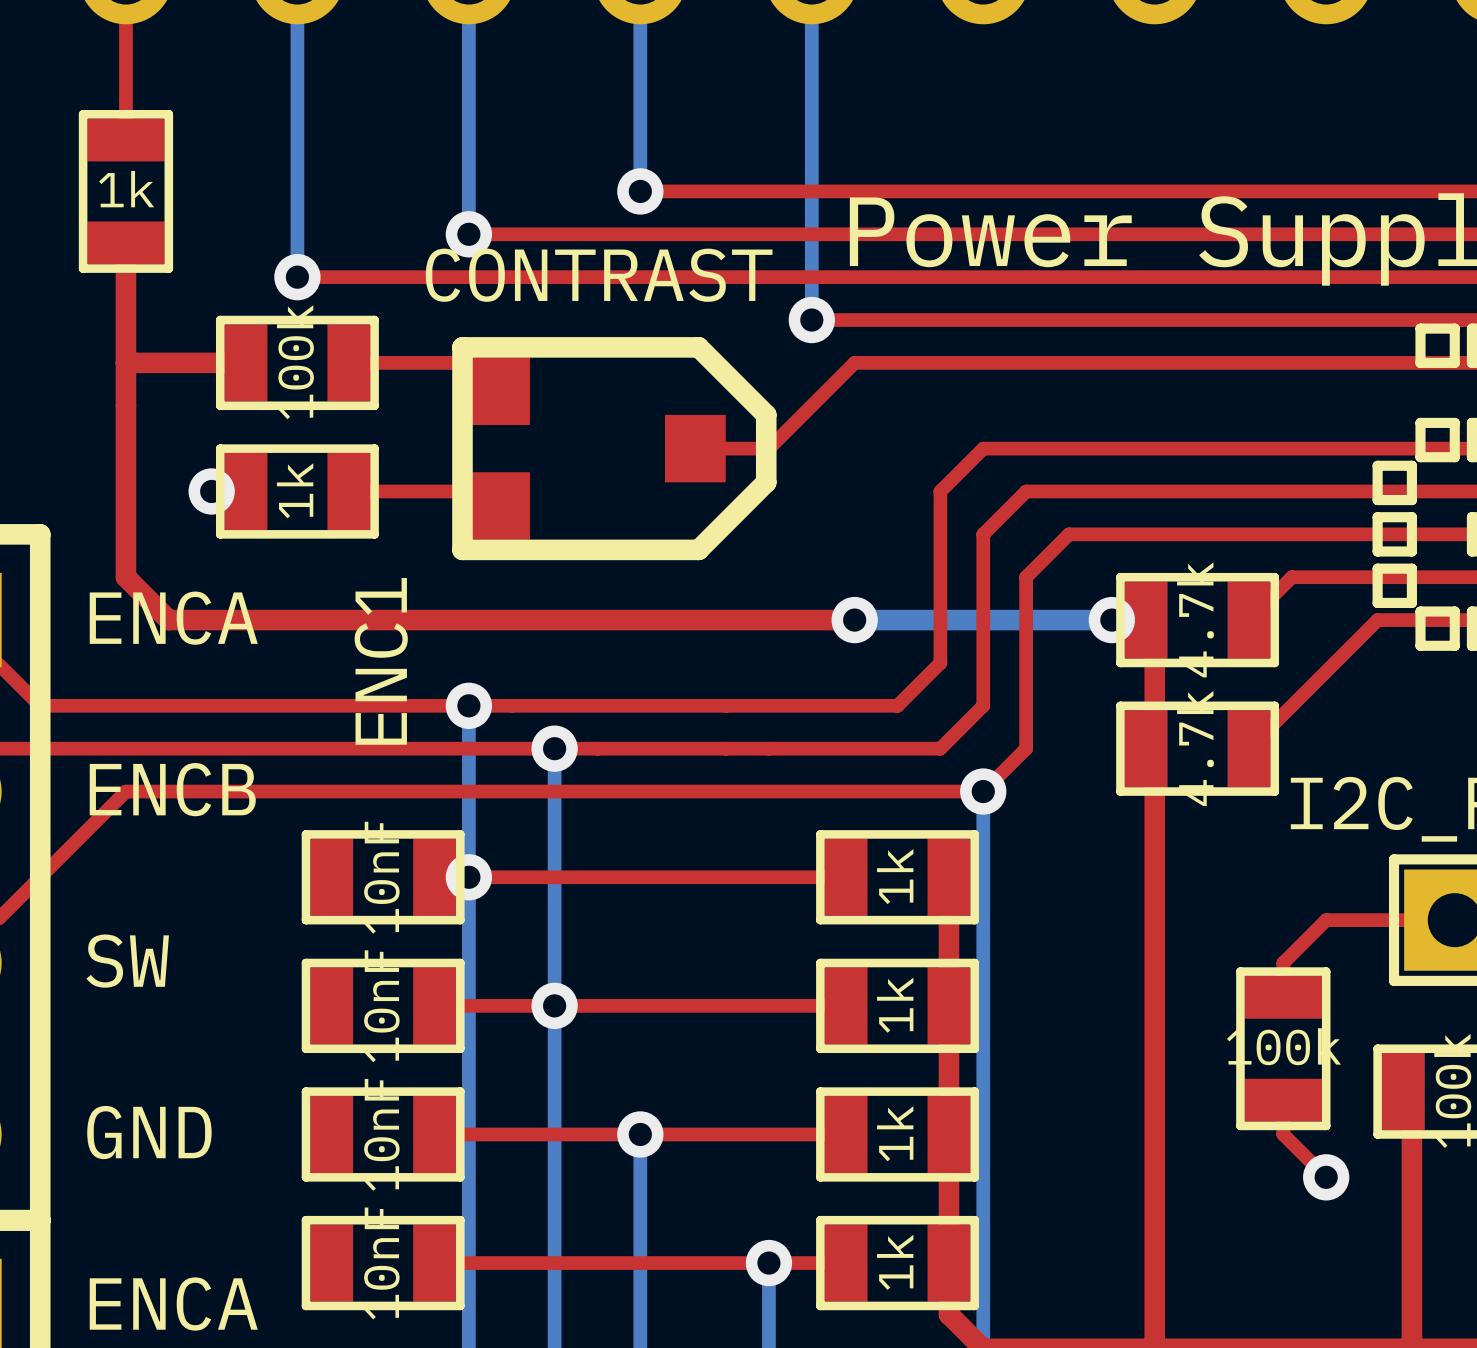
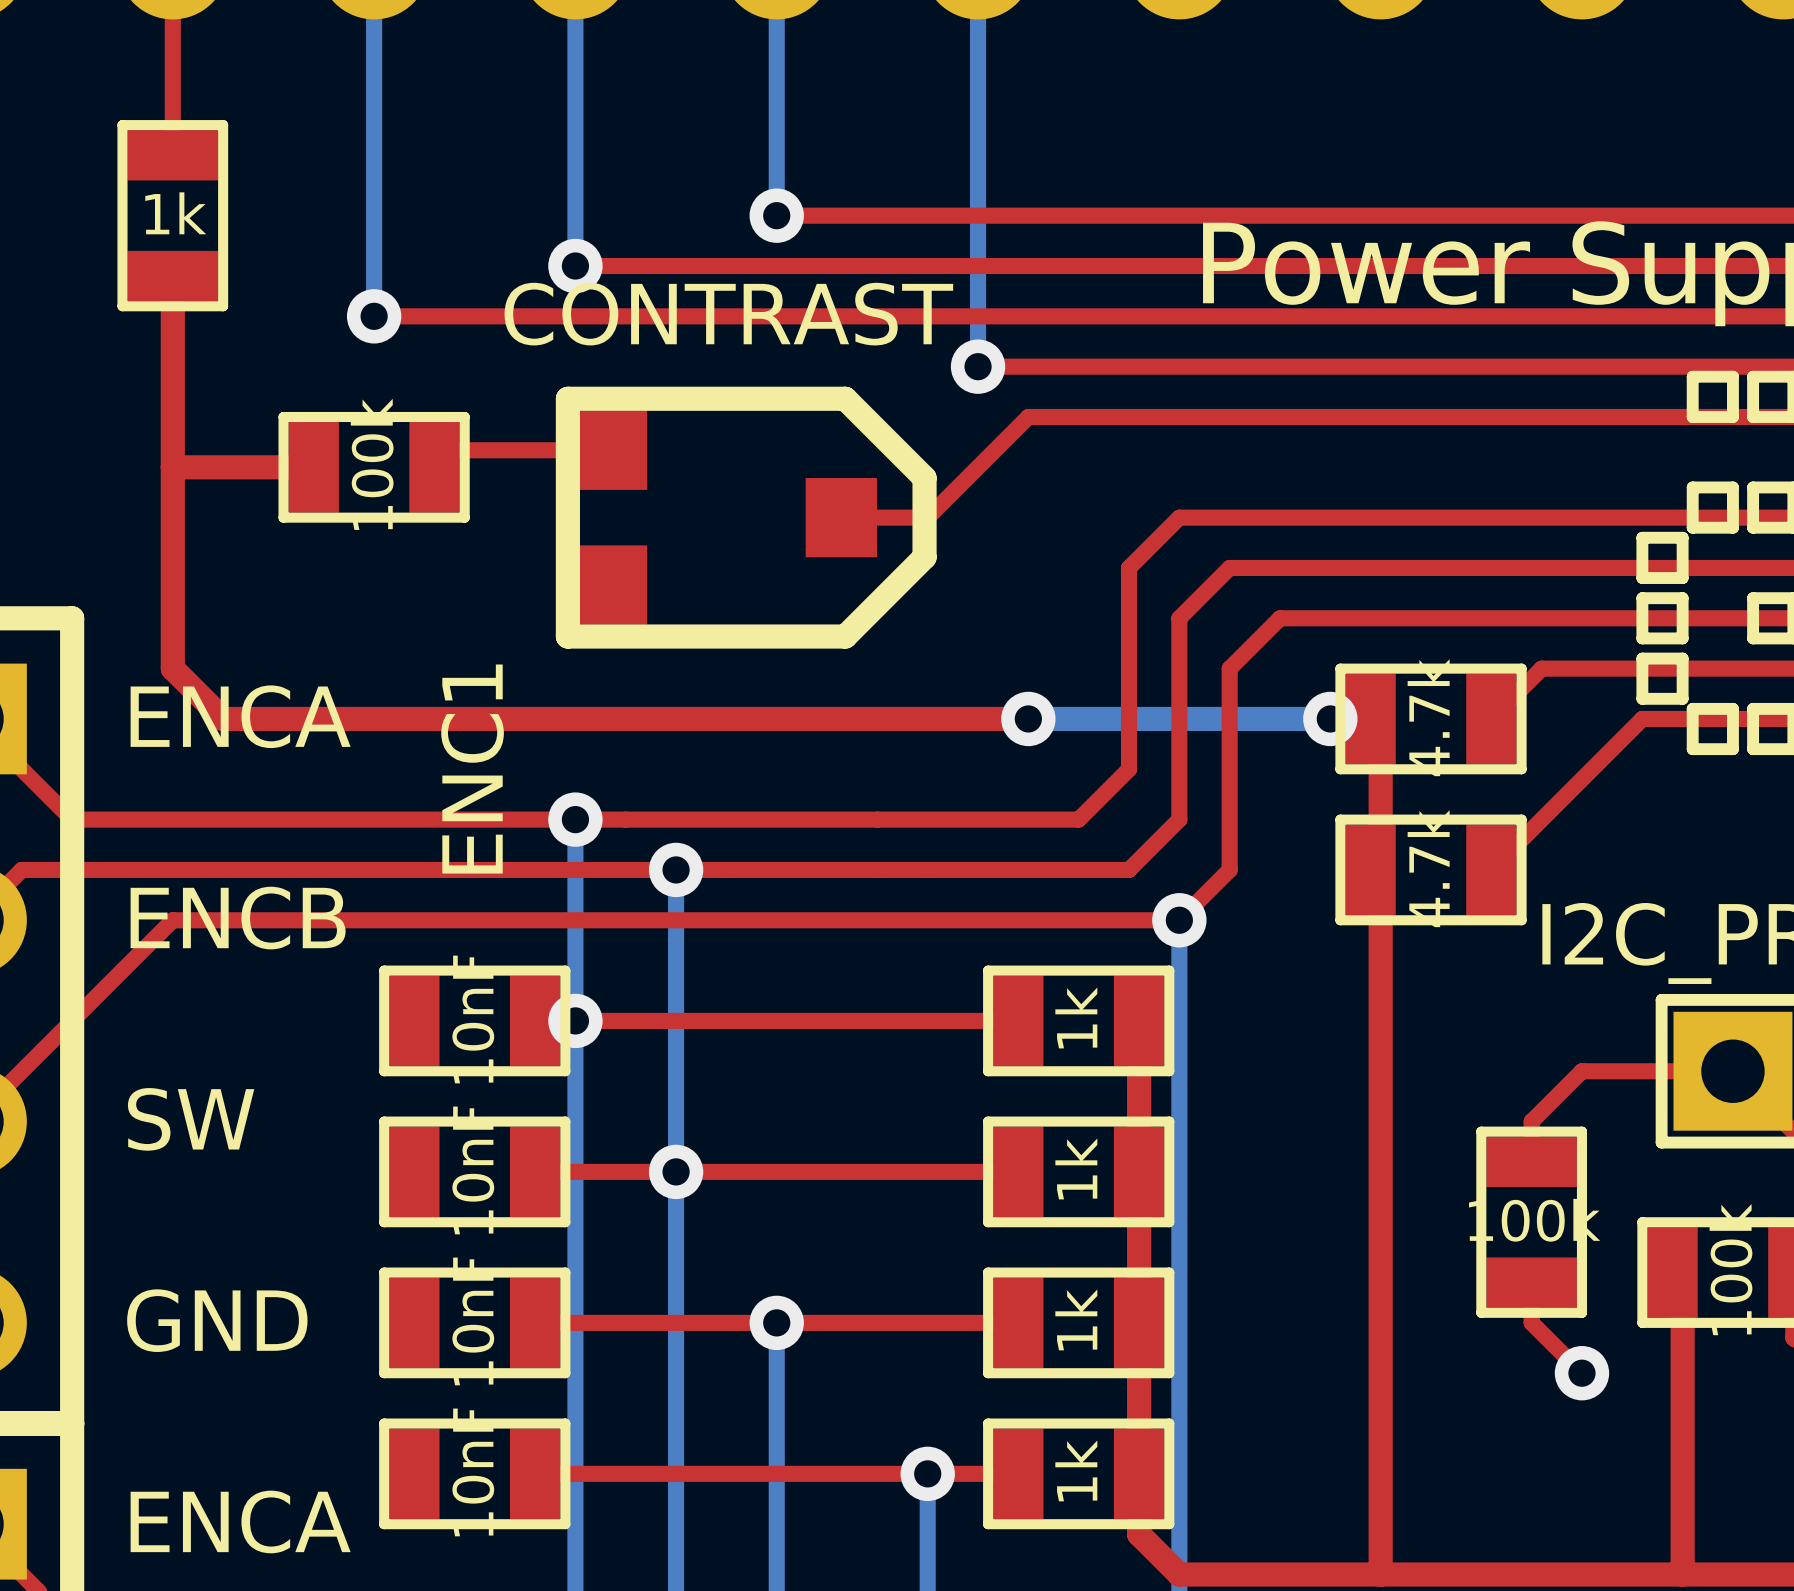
top track: (125, 362) (245, 362) -> (172, 467) (313, 467)
part position: (297, 362) -> (374, 467)
top track: (348, 362) (471, 362) (499, 391) -> (434, 467) (451, 450) (611, 450)
via: (211, 491) -> none
part: 1k (297, 491) -> none
top track: (348, 491) (485, 491) (499, 506) -> none

